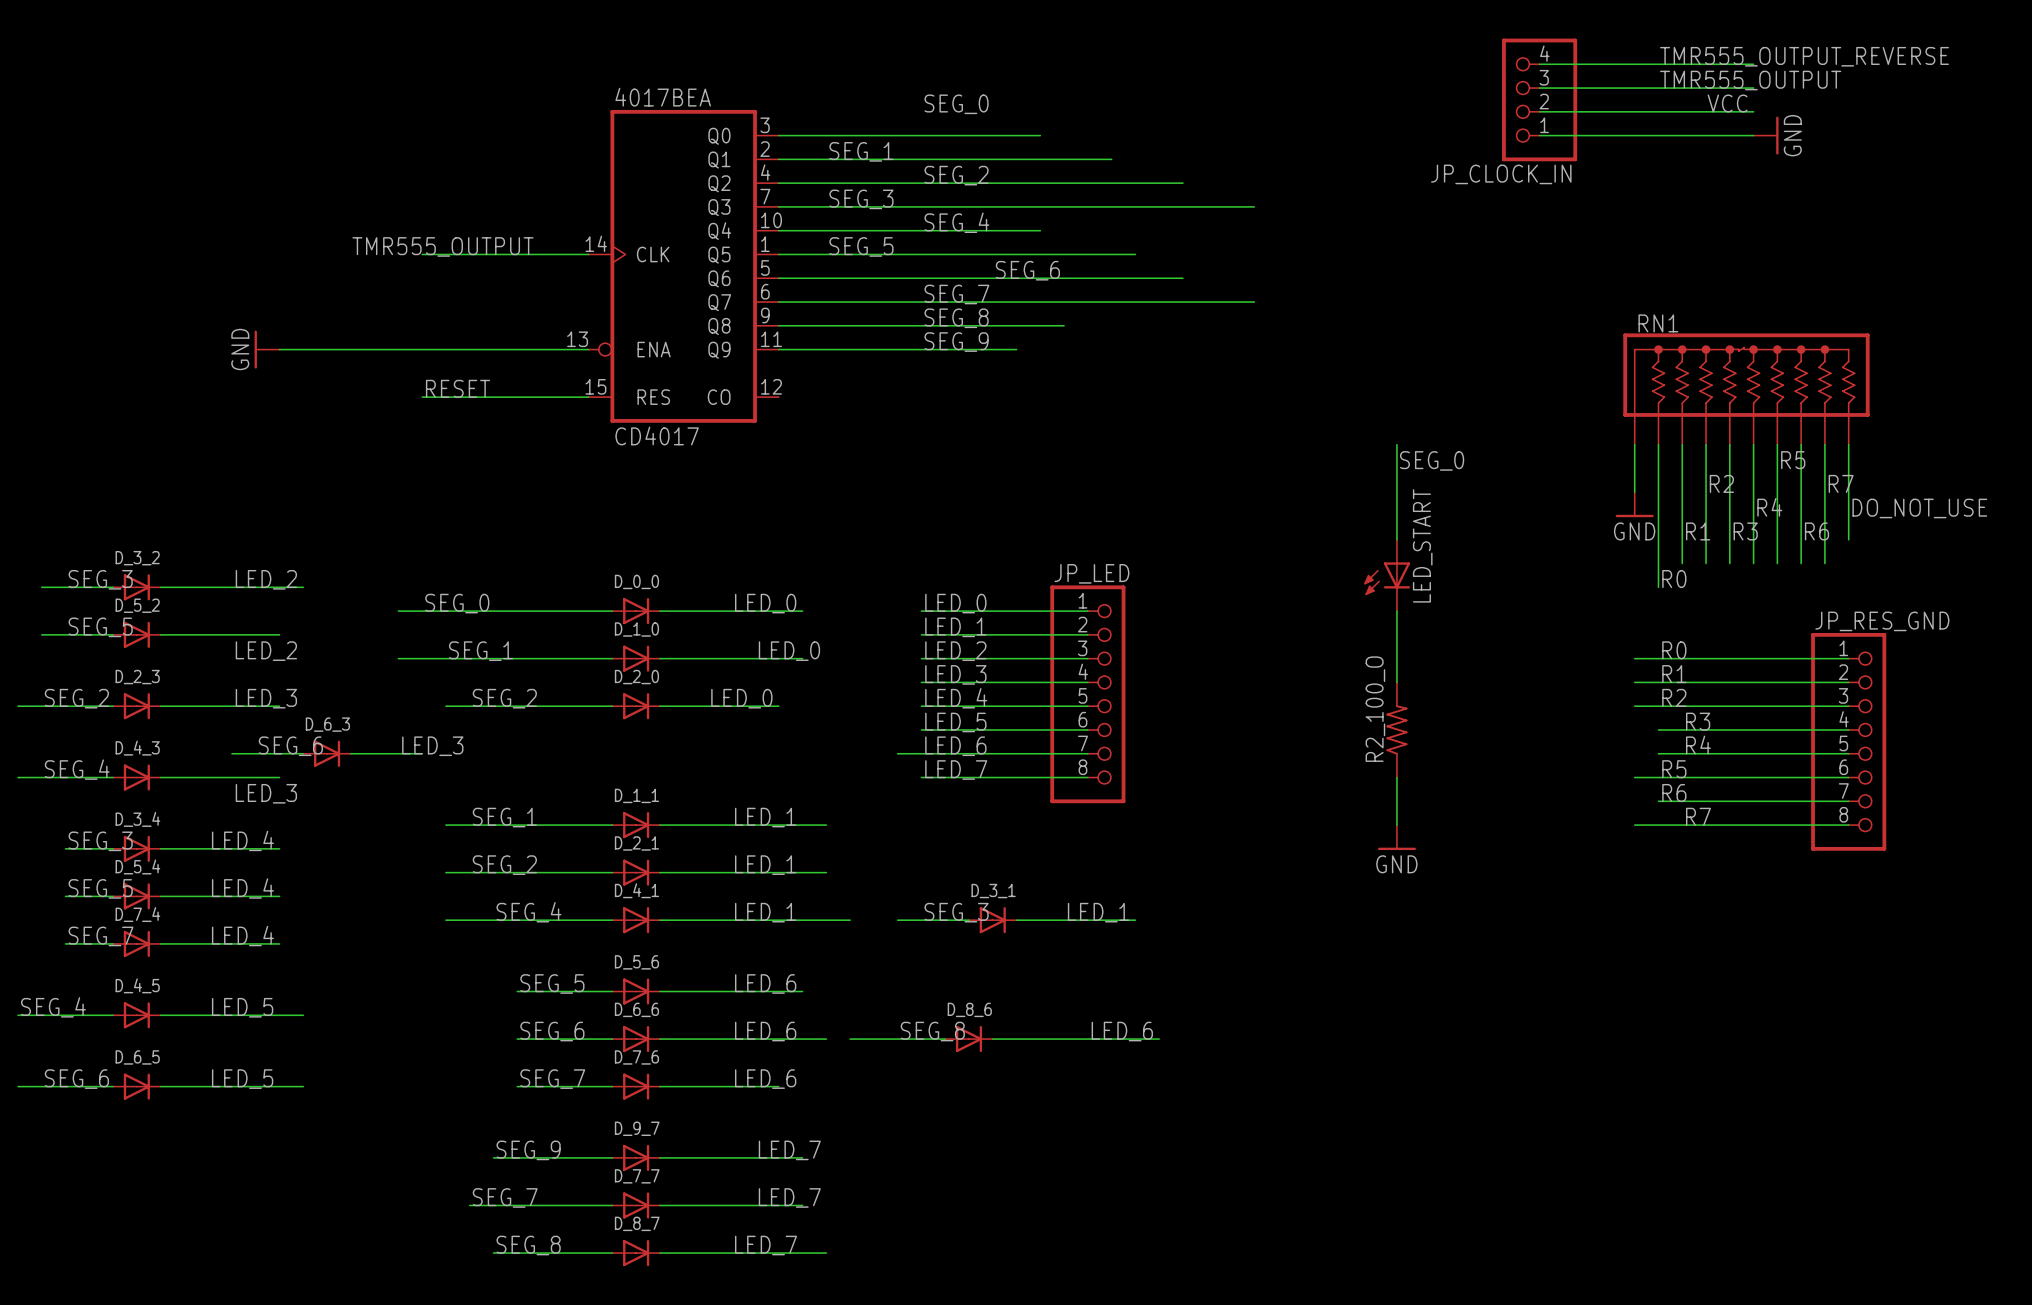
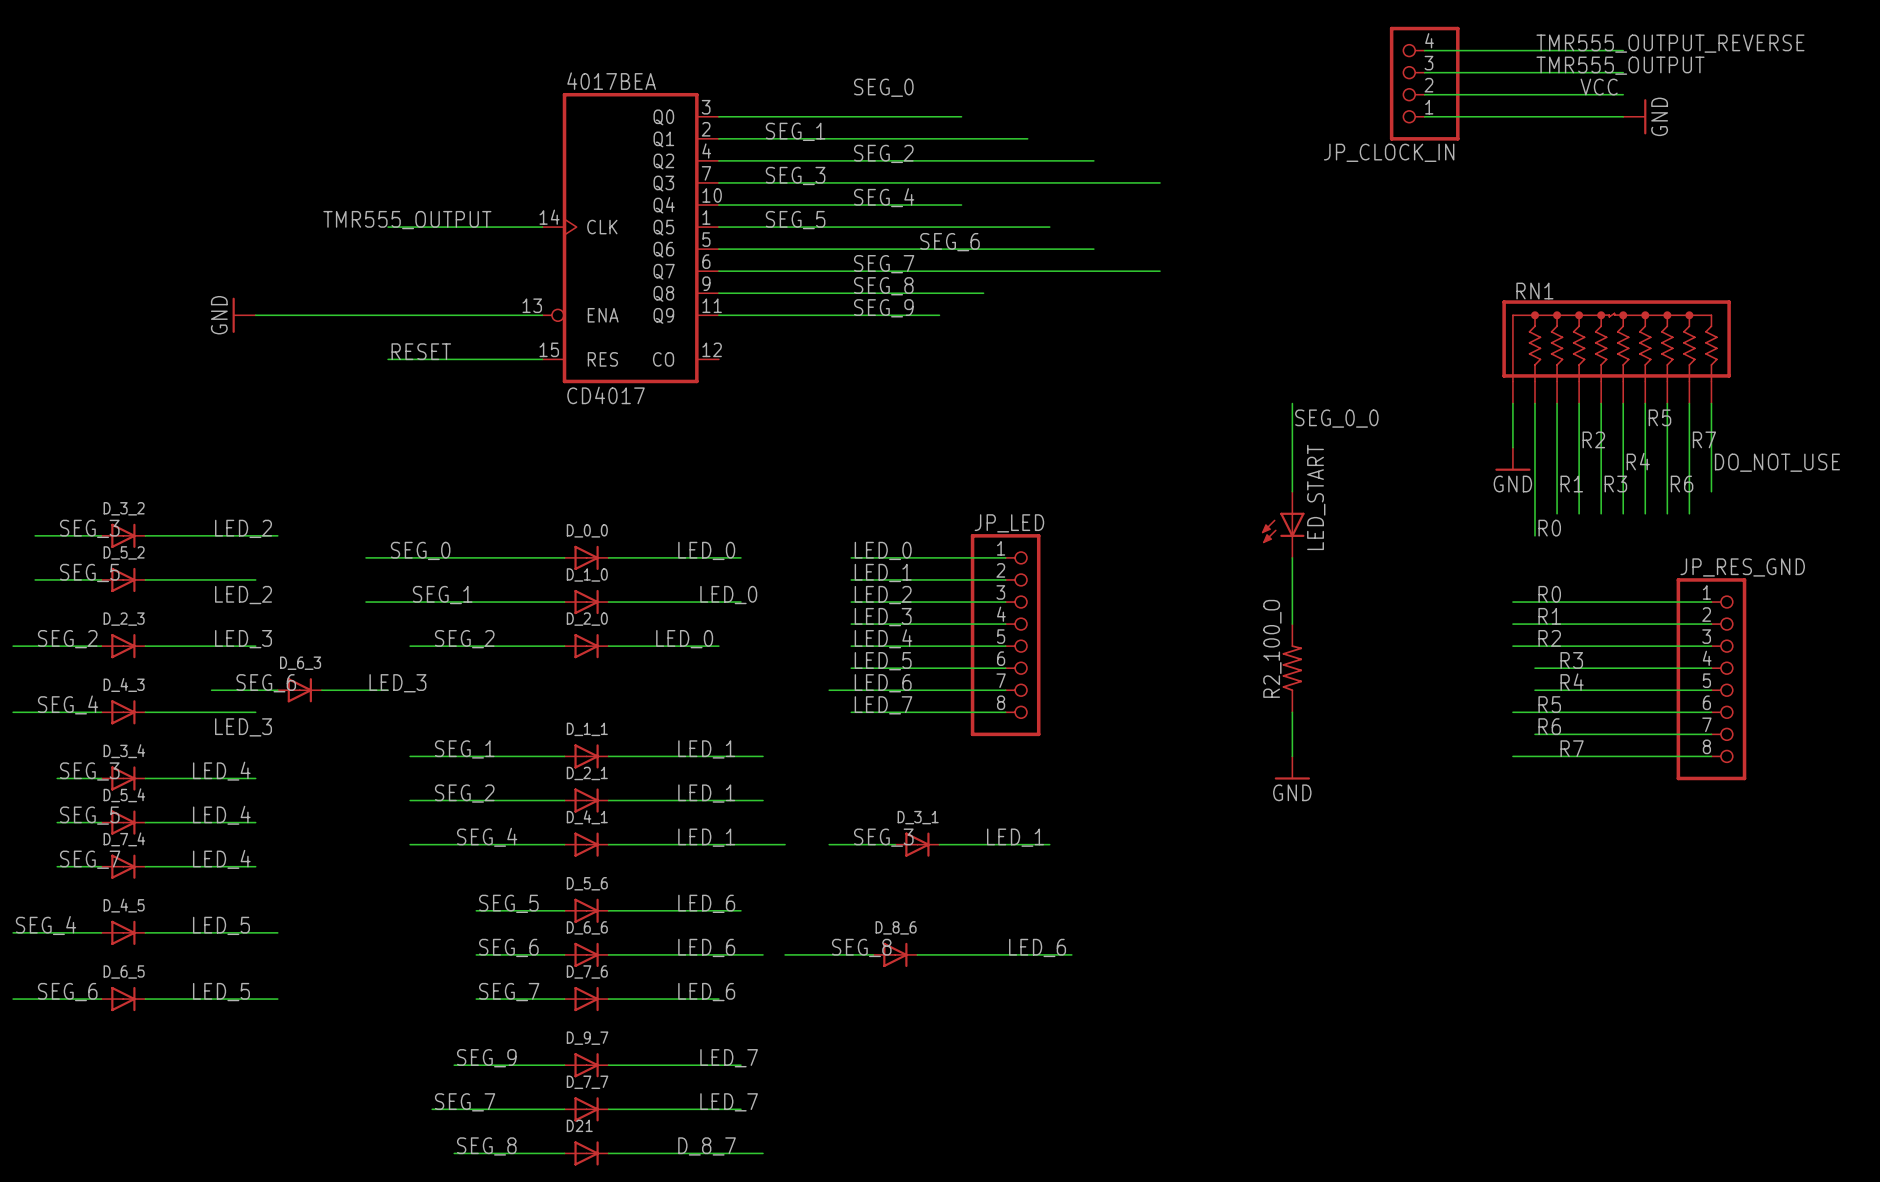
label: SEG_0 (1432, 460) -> SEG_0_0 (1336, 418)
D_8_7 name: D_8_7 (637, 1223) -> D21 (579, 1125)
label: LED_7 (766, 1245) -> D_8_7 (707, 1146)

